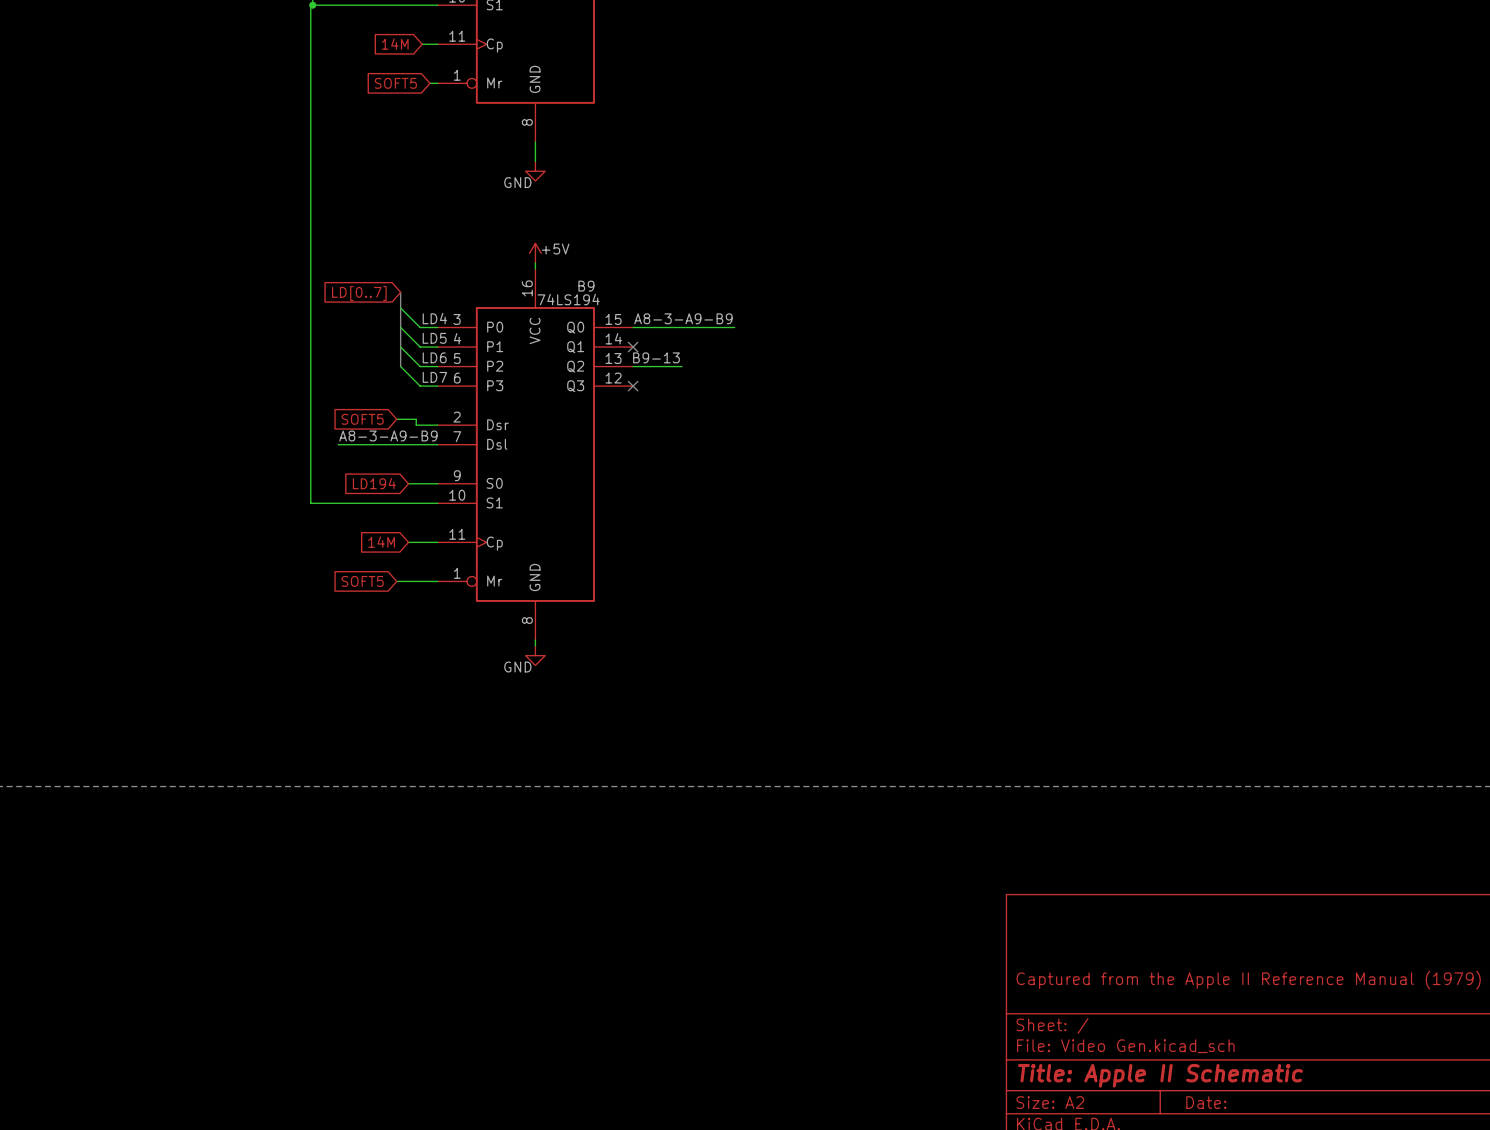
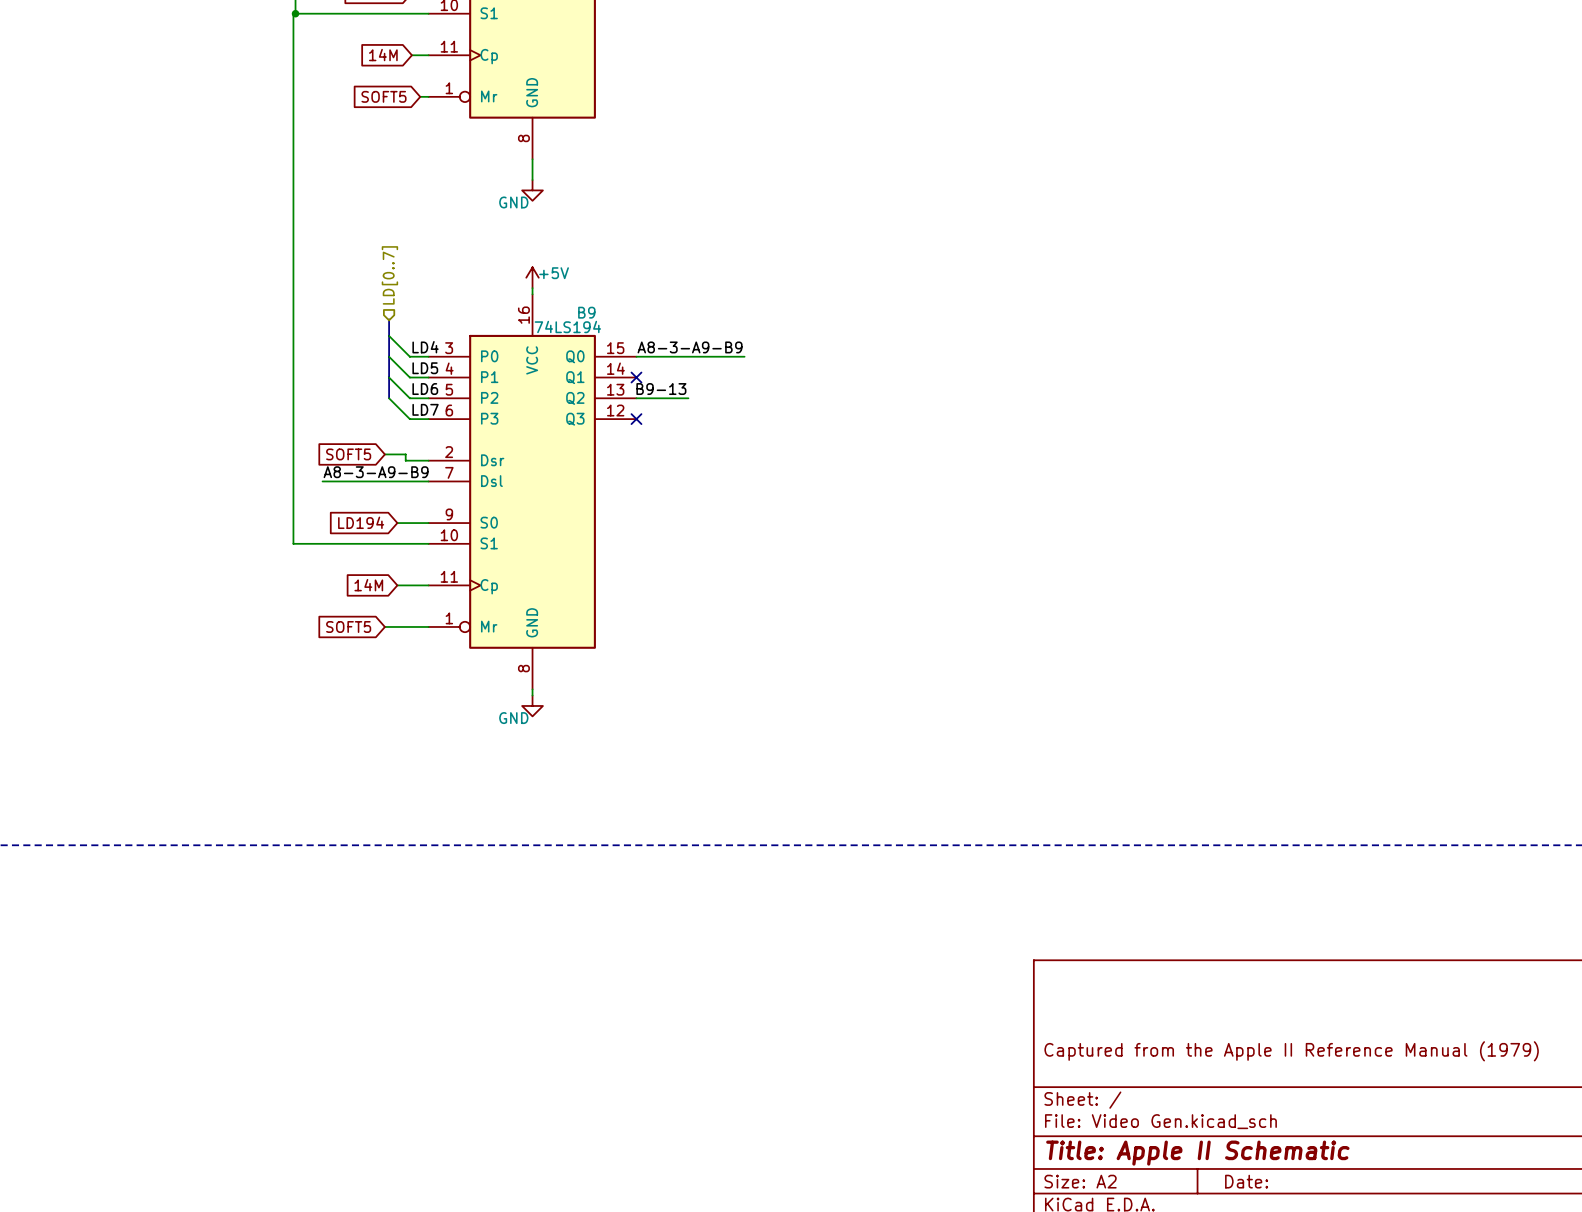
hierarchical label: none -> LD[0..7] (389, 275)
global label: LD[0..7] (359, 293) -> none

